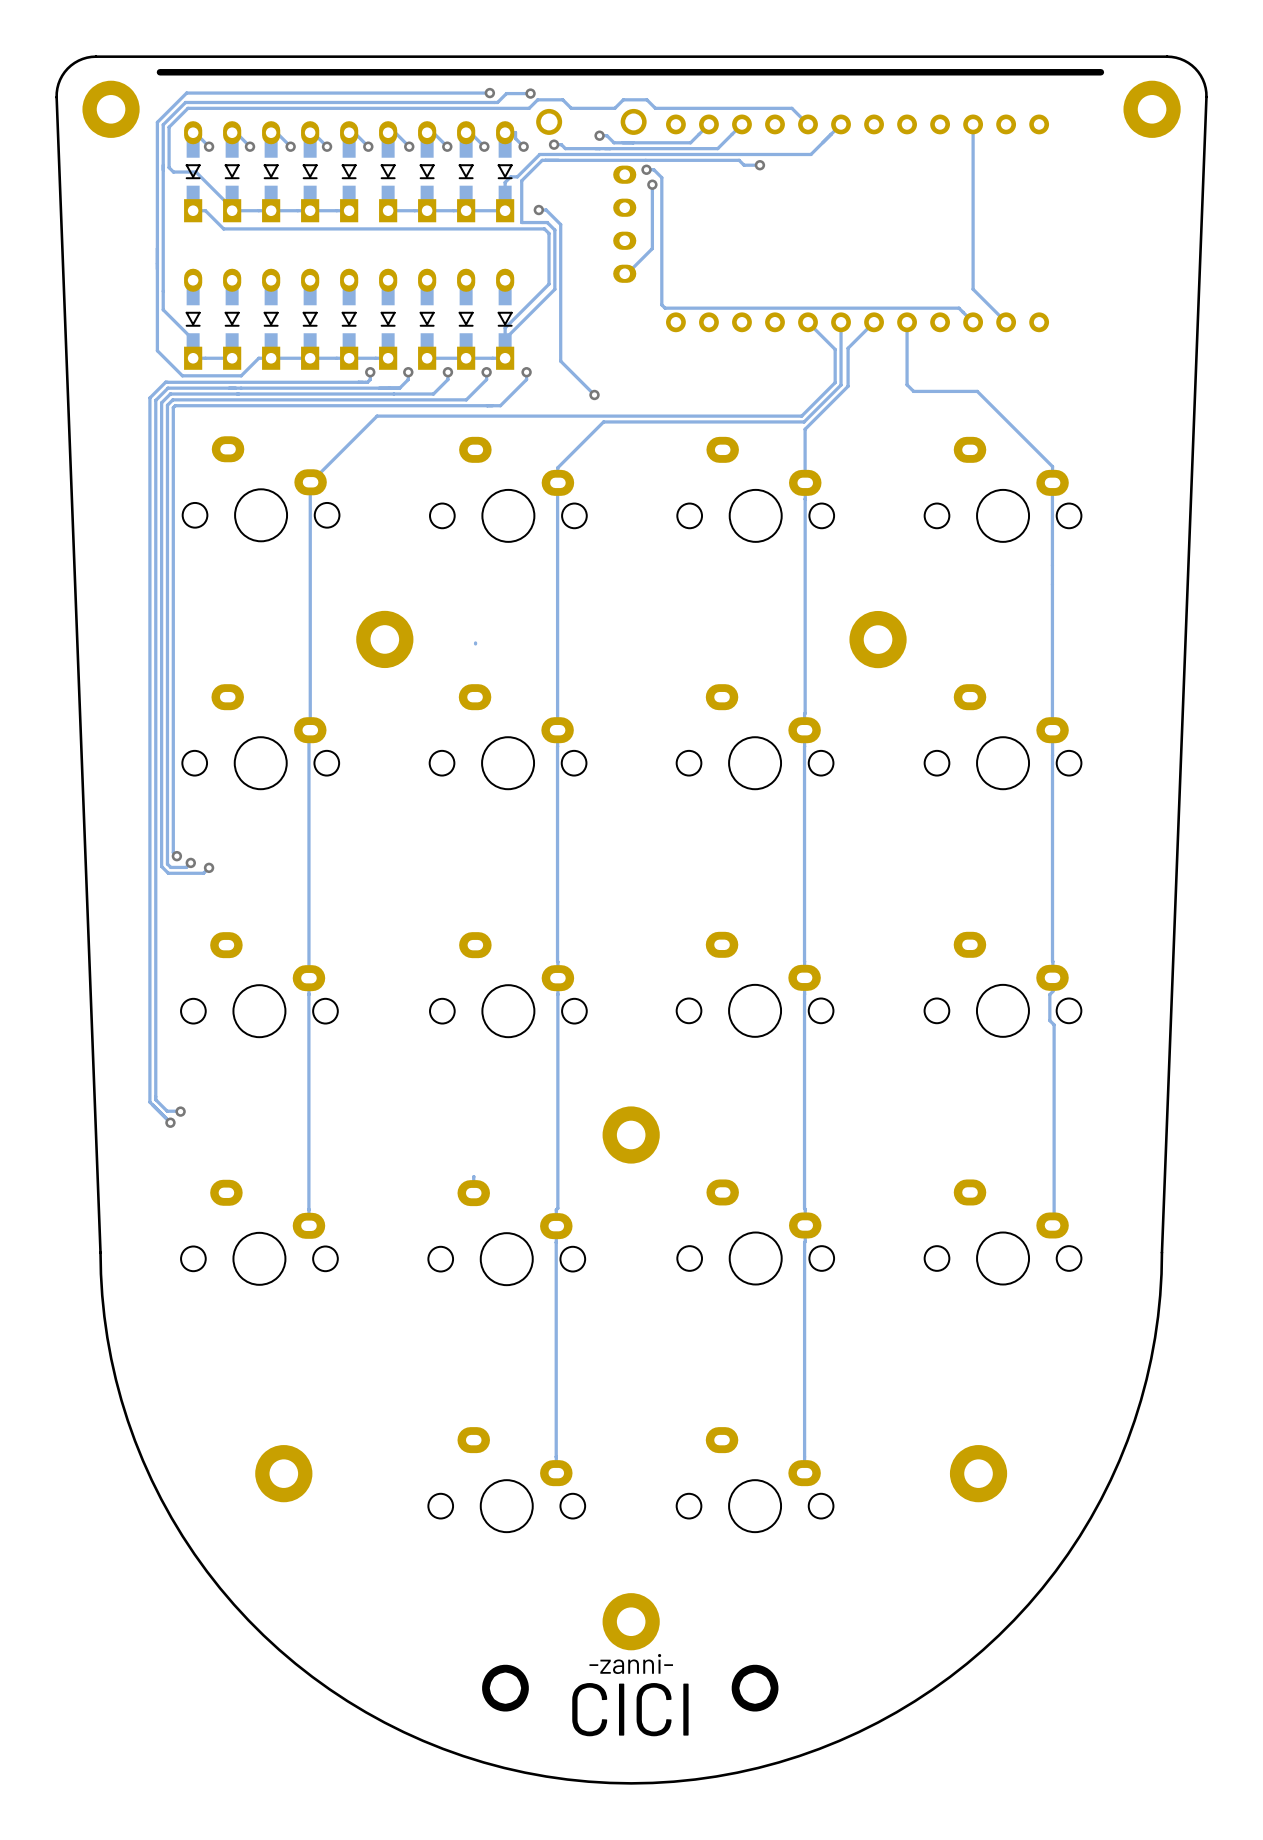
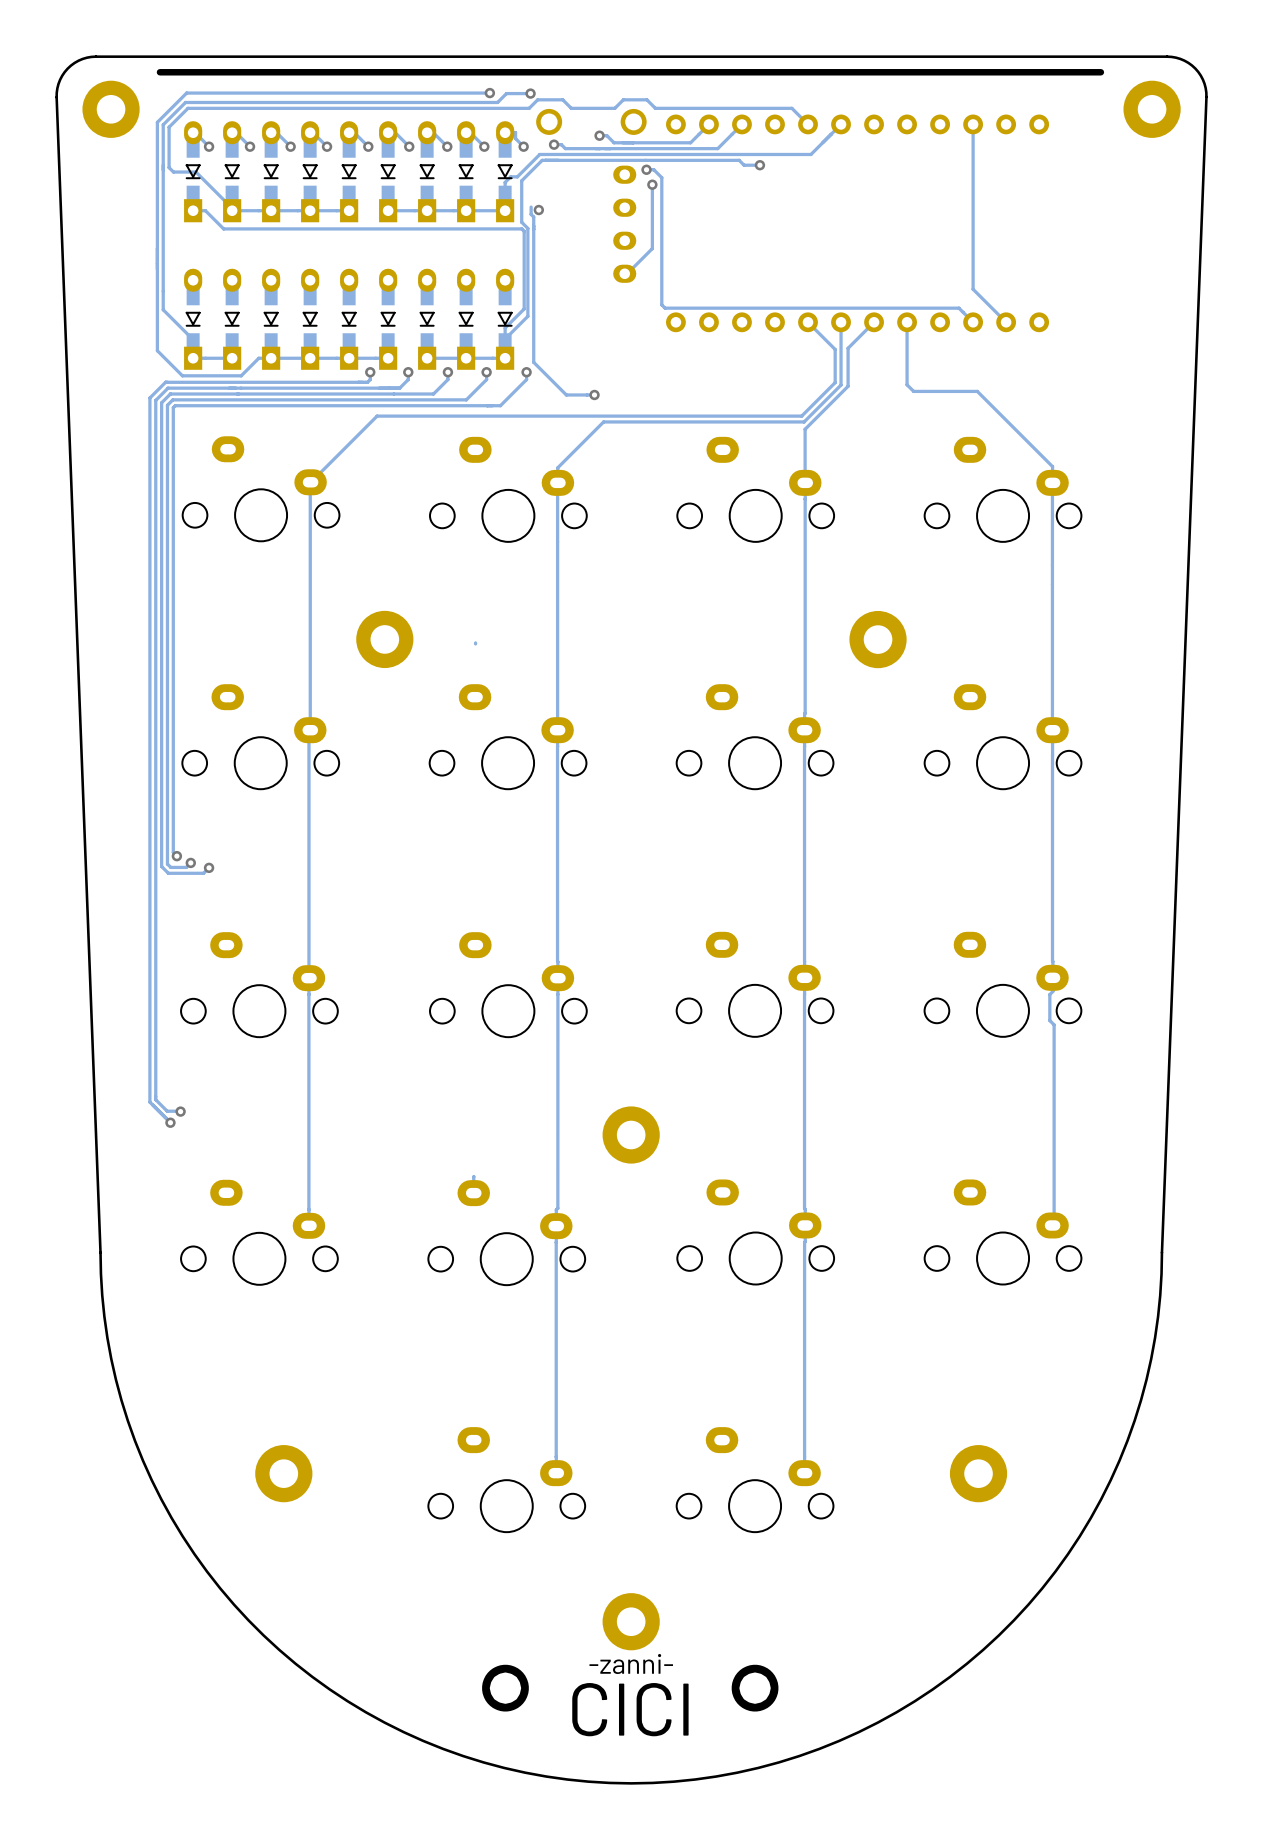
track: (538, 210) (546, 210) (560, 224) (560, 361) (594, 394) -> (531, 207) (531, 214) (533, 217) (533, 362) (566, 394) (594, 394)
track: (521, 222) (547, 222) (554, 230) (554, 289) (527, 316) -> (521, 222) (527, 228) (527, 316)
track: (521, 228) (544, 228) (549, 233) (549, 284) (524, 308) -> (521, 228) (524, 231) (524, 308)

